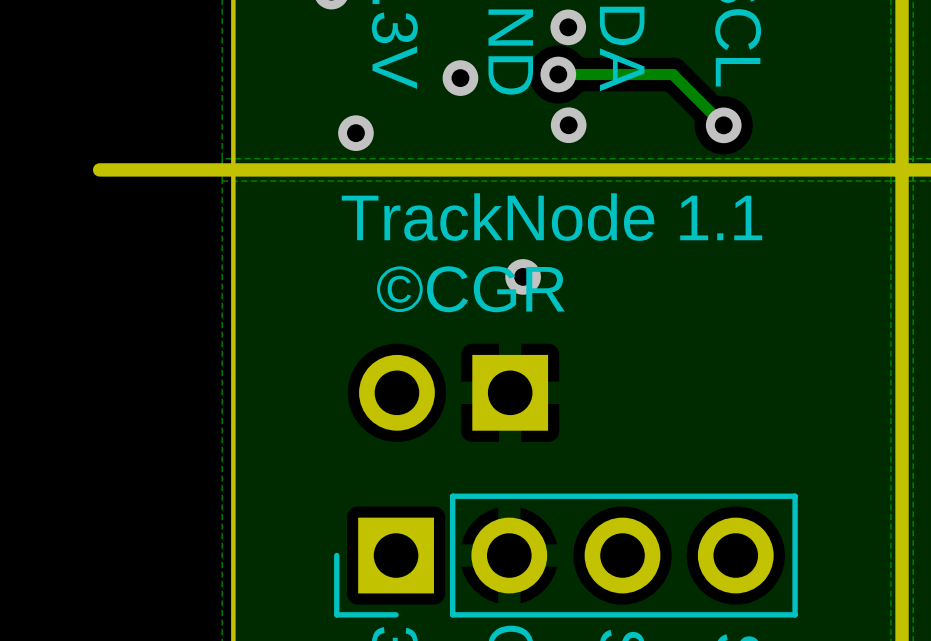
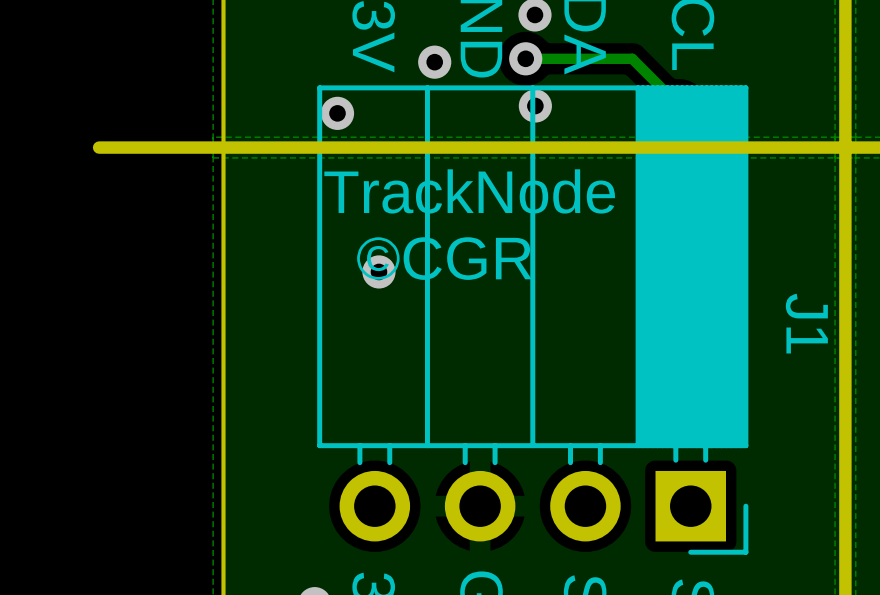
via position: (523, 276) -> (378, 271)
J1: none -> (532, 320)
part: (453, 392) -> none
part: (565, 555) -> none

